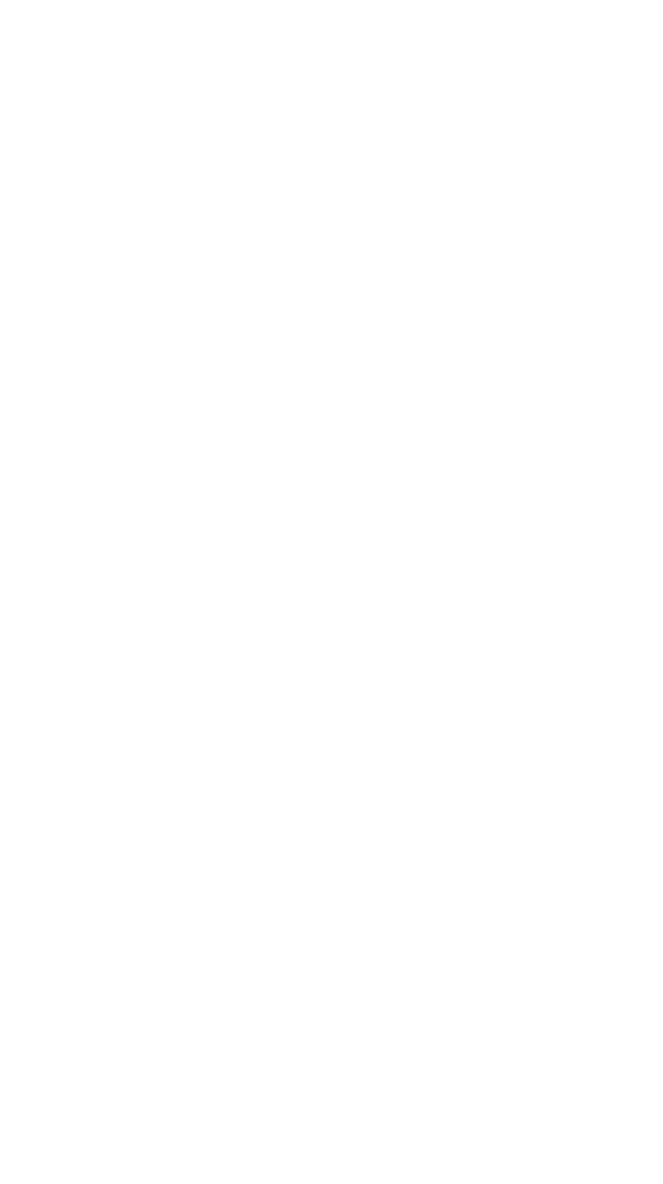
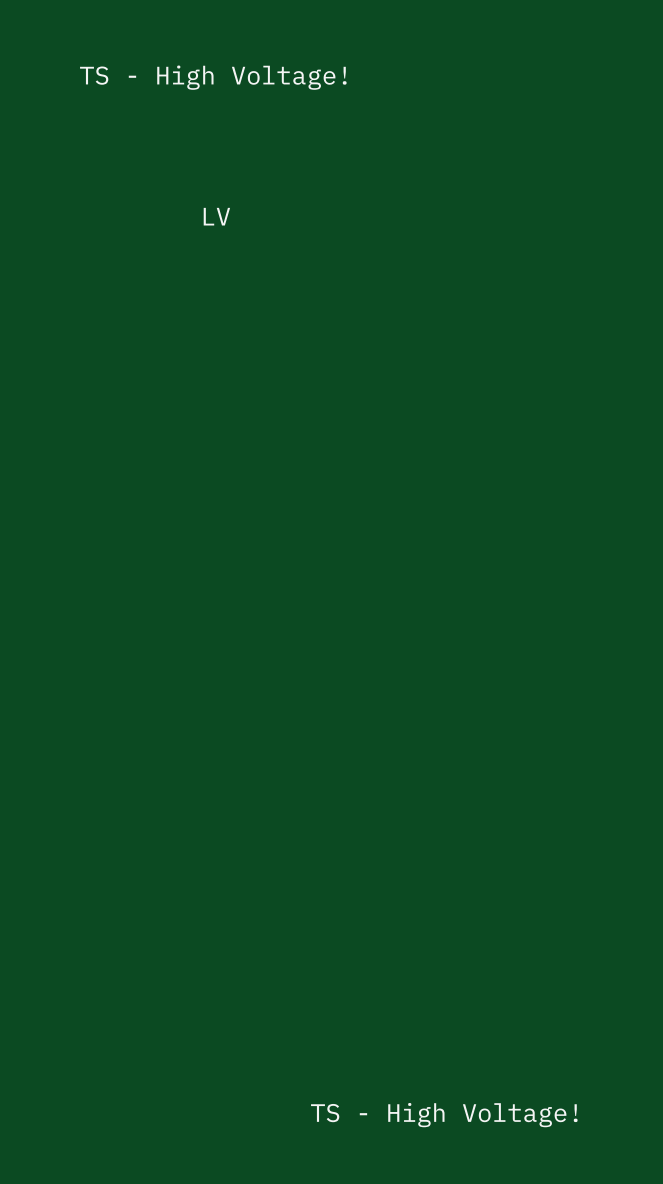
text: none -> TS - High Voltage! (213, 77)
text: none -> LV (216, 216)
text: none -> TS - High Voltage! (444, 1115)

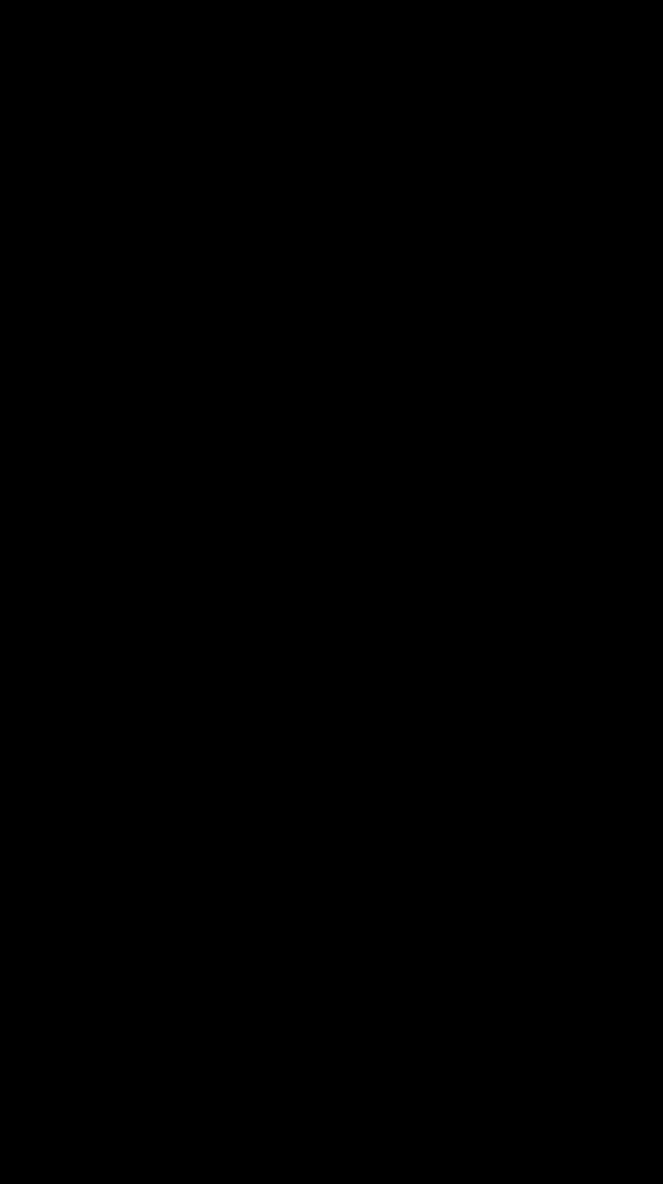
text: TS - High Voltage! (213, 77) -> none
text: LV (216, 216) -> none
text: TS - High Voltage! (444, 1115) -> none

